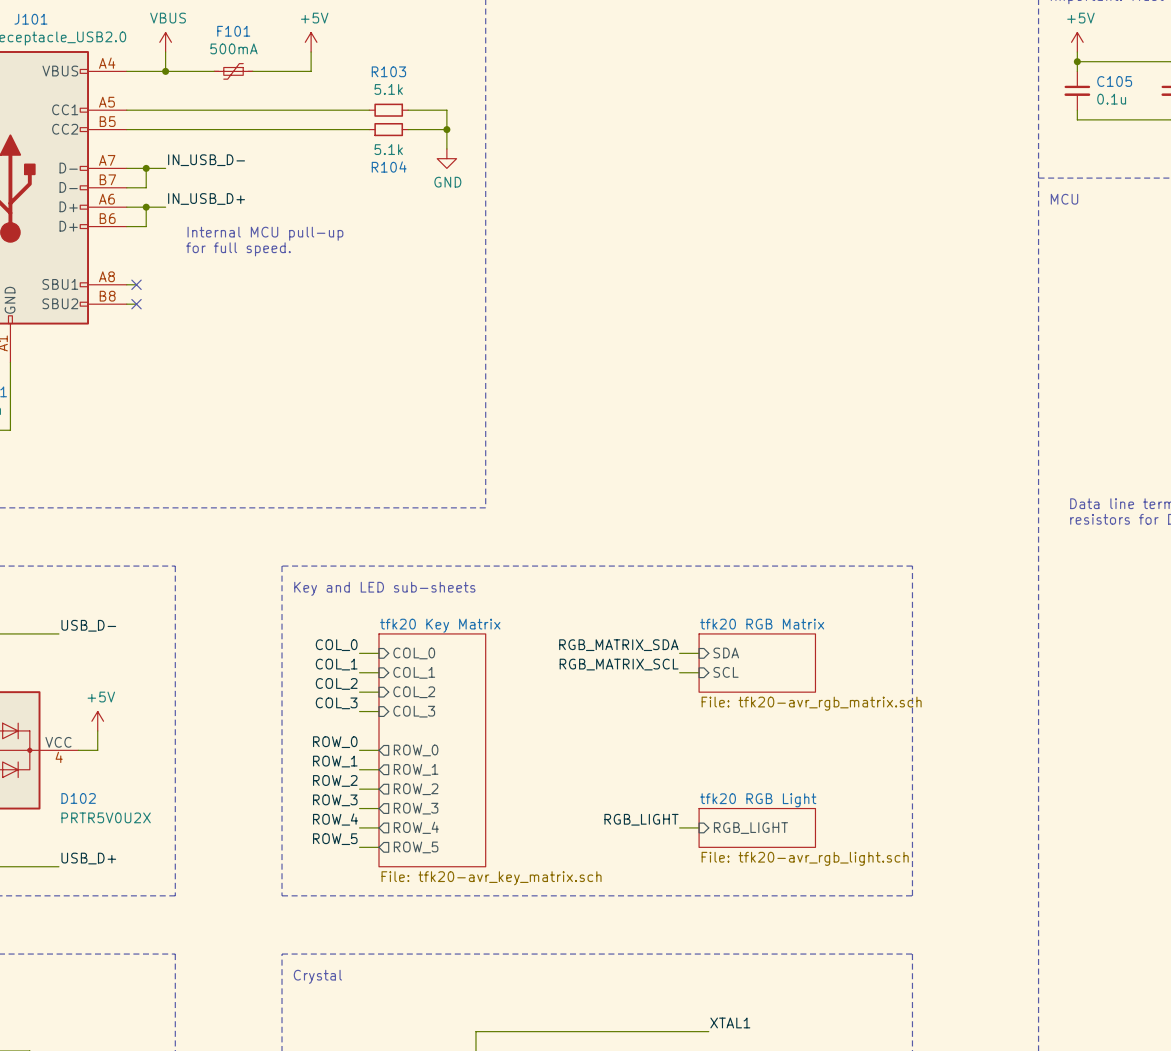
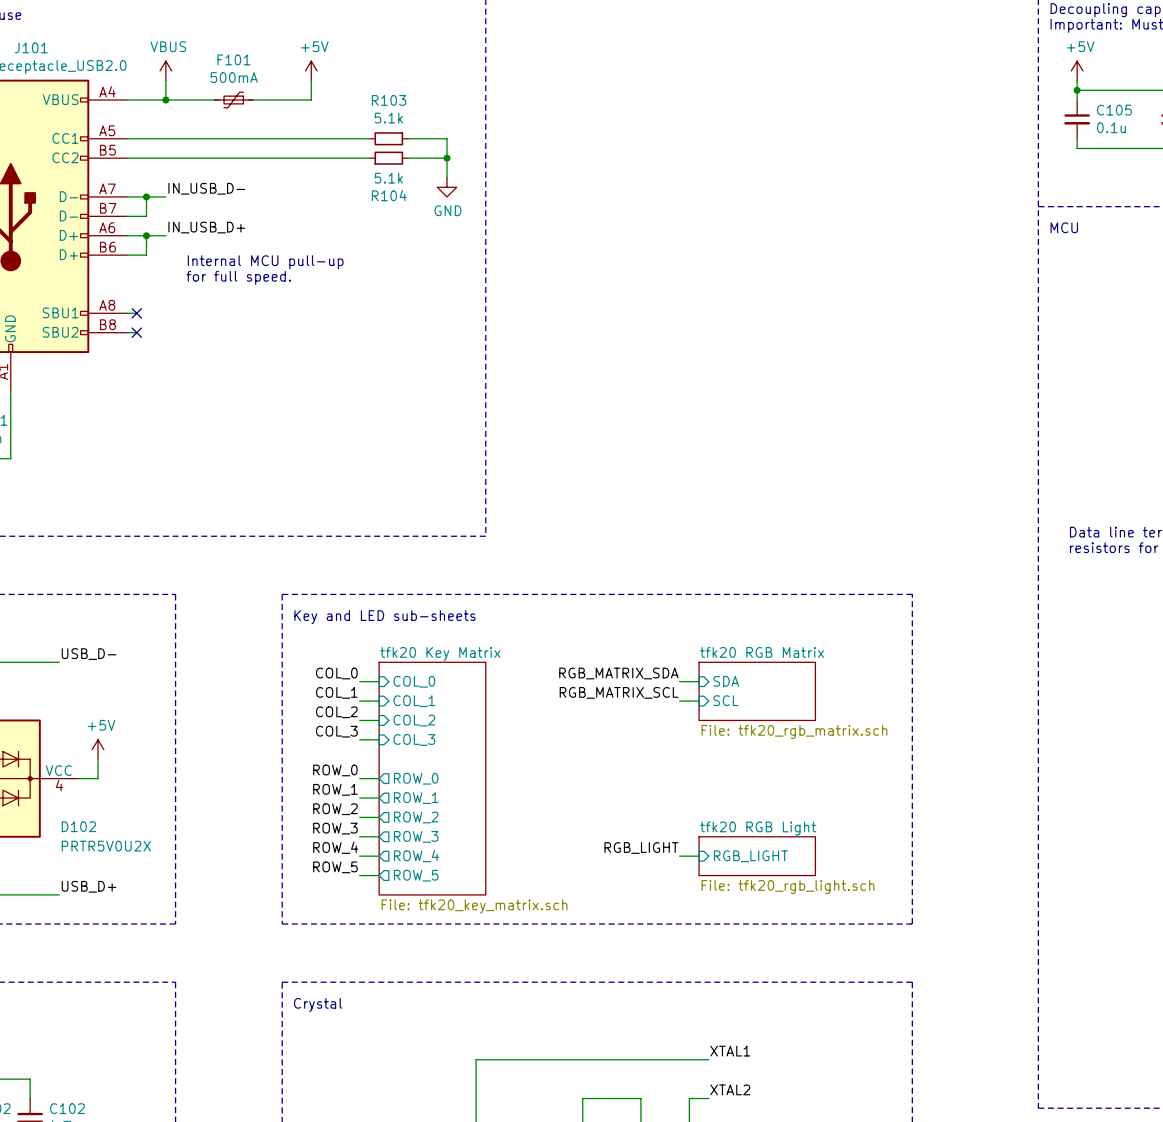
sheet tfk20 RGB Matrix value: File: tfk20-avr_rgb_matrix.sch (811, 703) -> File: tfk20_rgb_matrix.sch (794, 731)
sheet tfk20 RGB Light value: File: tfk20-avr_rgb_light.sch (805, 858) -> File: tfk20_rgb_light.sch (787, 887)
sheet tfk20 Key Matrix value: File: tfk20-avr_key_matrix.sch (491, 878) -> File: tfk20_key_matrix.sch (474, 906)

